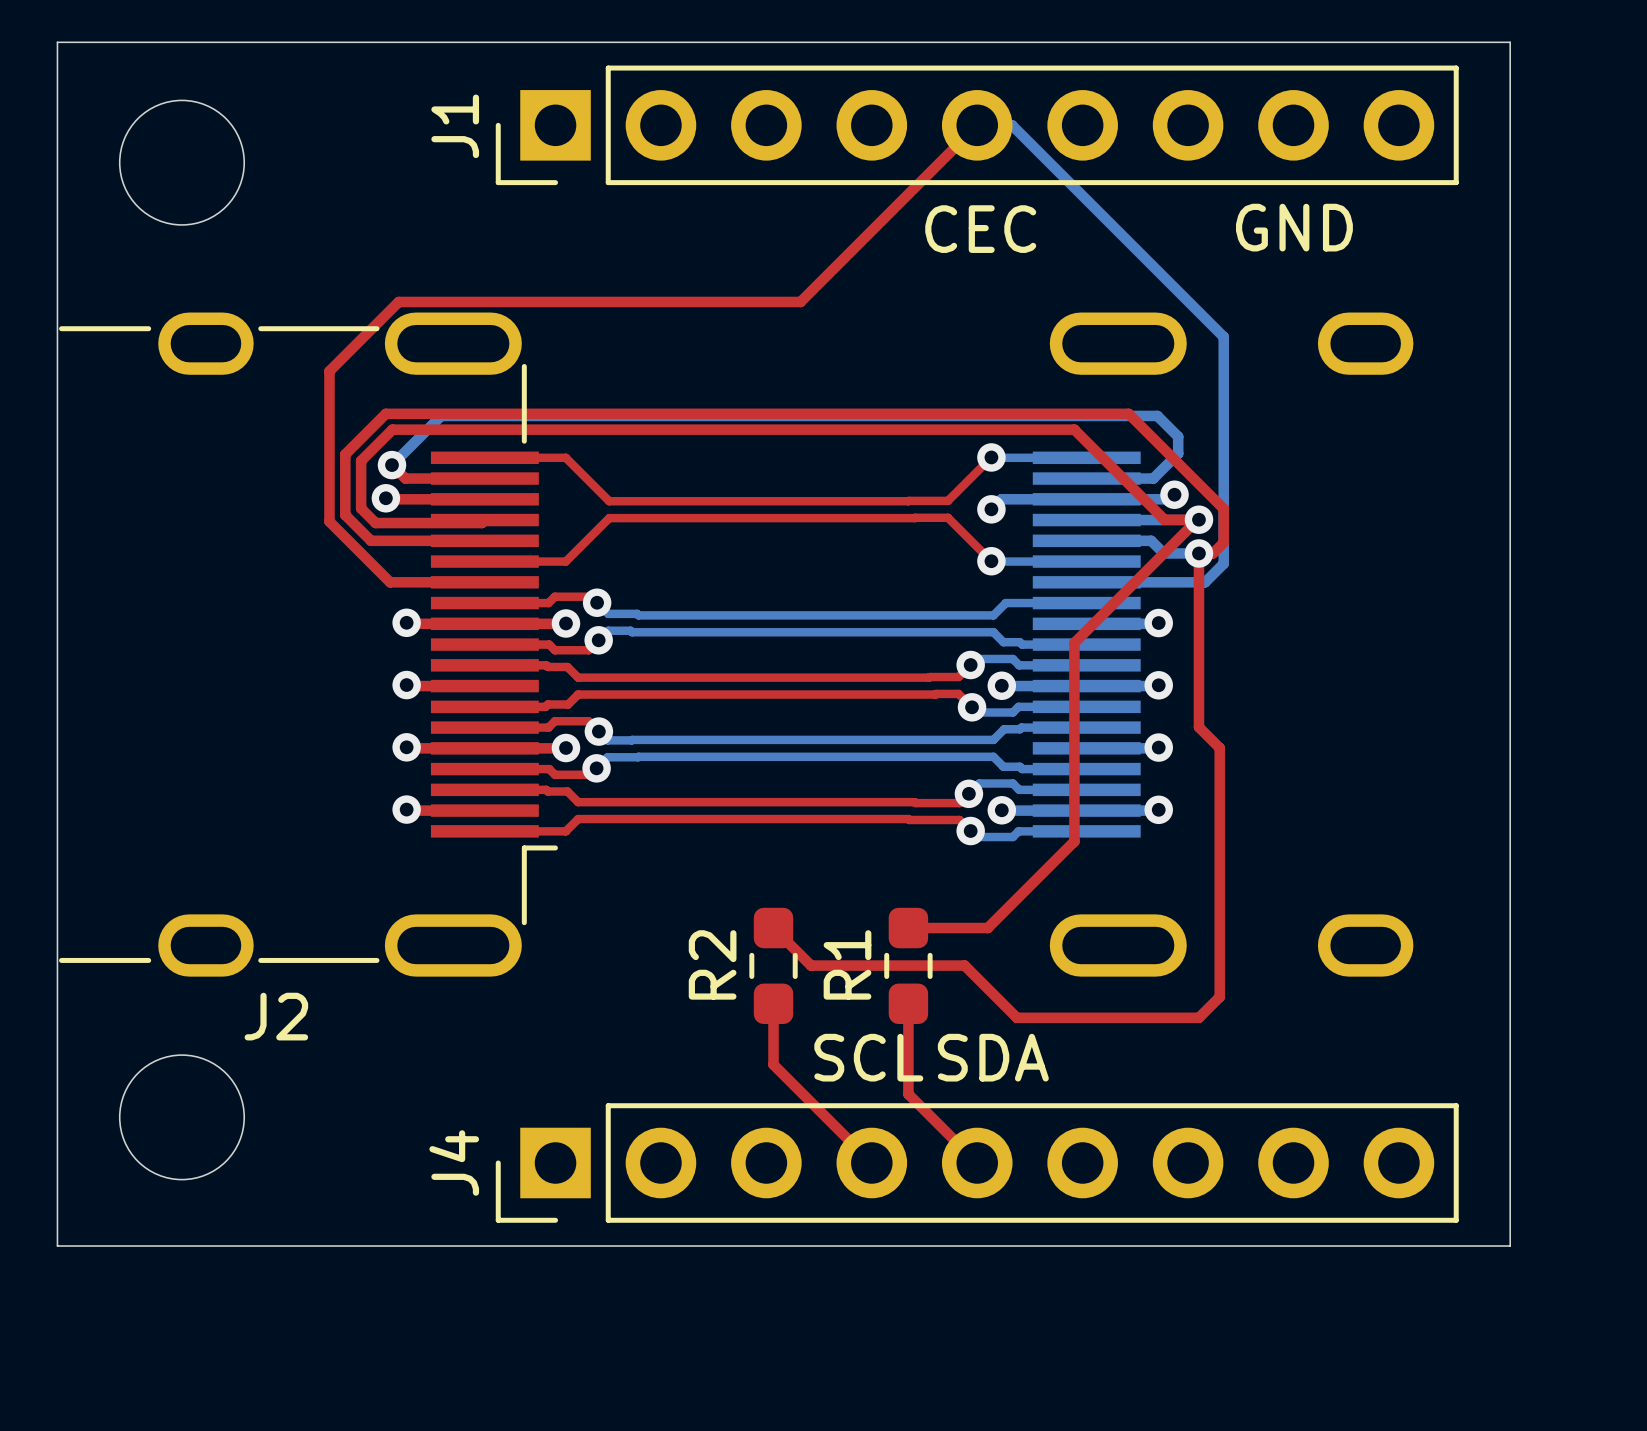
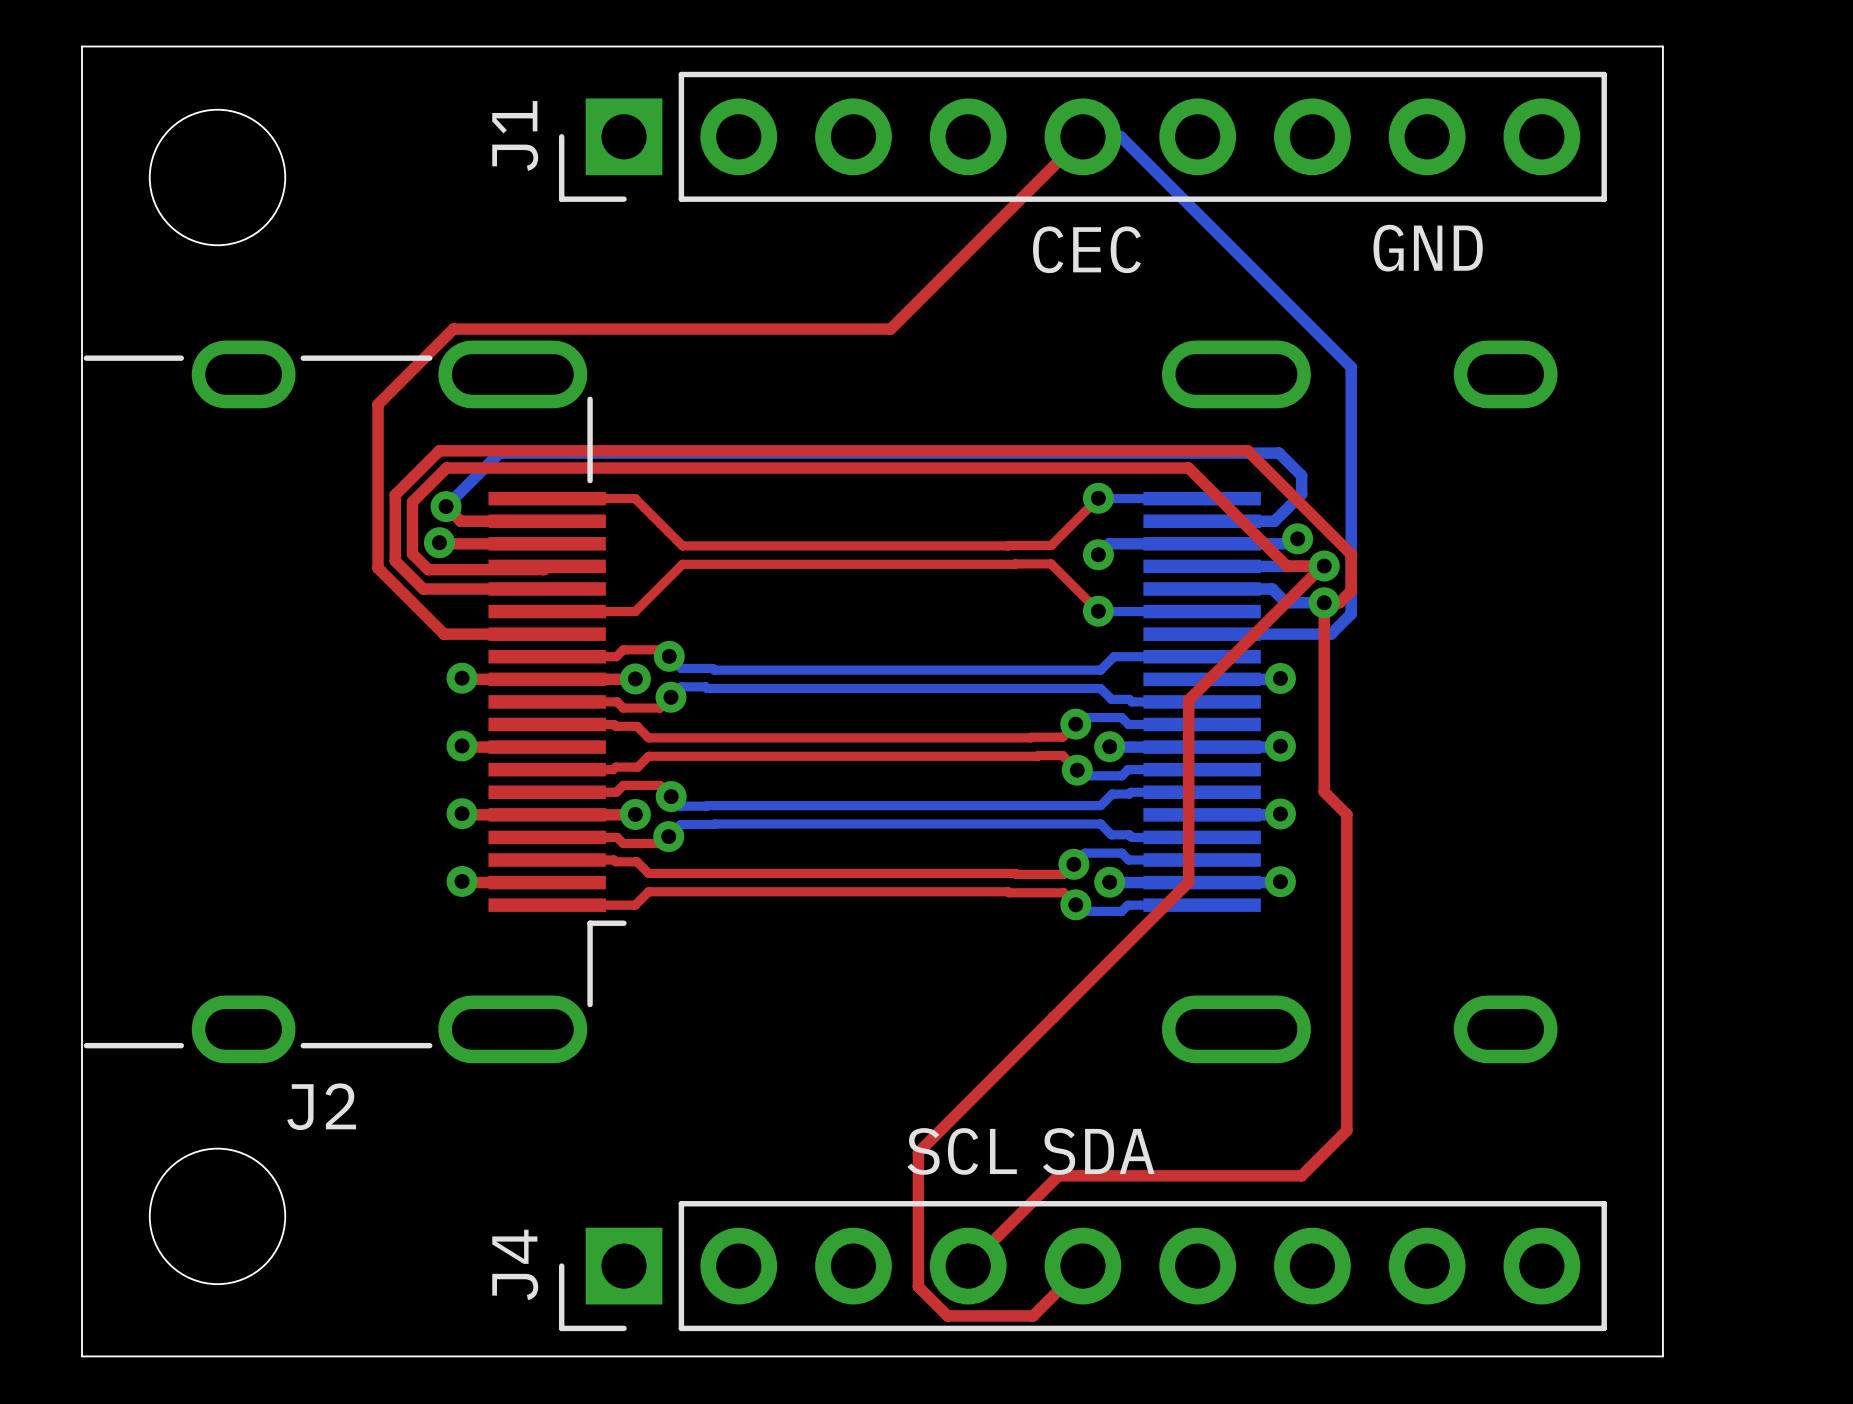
top track: (1074, 810) (1074, 841) (987, 928) (908, 928) -> (1188, 882) (918, 1152) (918, 1286) (947, 1315) (1033, 1315) (1082, 1266)
top track: (773, 928) (811, 965) (964, 965) (1016, 1017) (1198, 1017) (1219, 997) -> (968, 1266) (1058, 1175) (1301, 1175) (1346, 1130) (1346, 1085)
R2: (773, 965) -> none
R1: (908, 965) -> none
top track: (773, 1003) (773, 1064) (860, 1151) -> none
top track: (908, 1003) (908, 1094) (977, 1163) -> none

